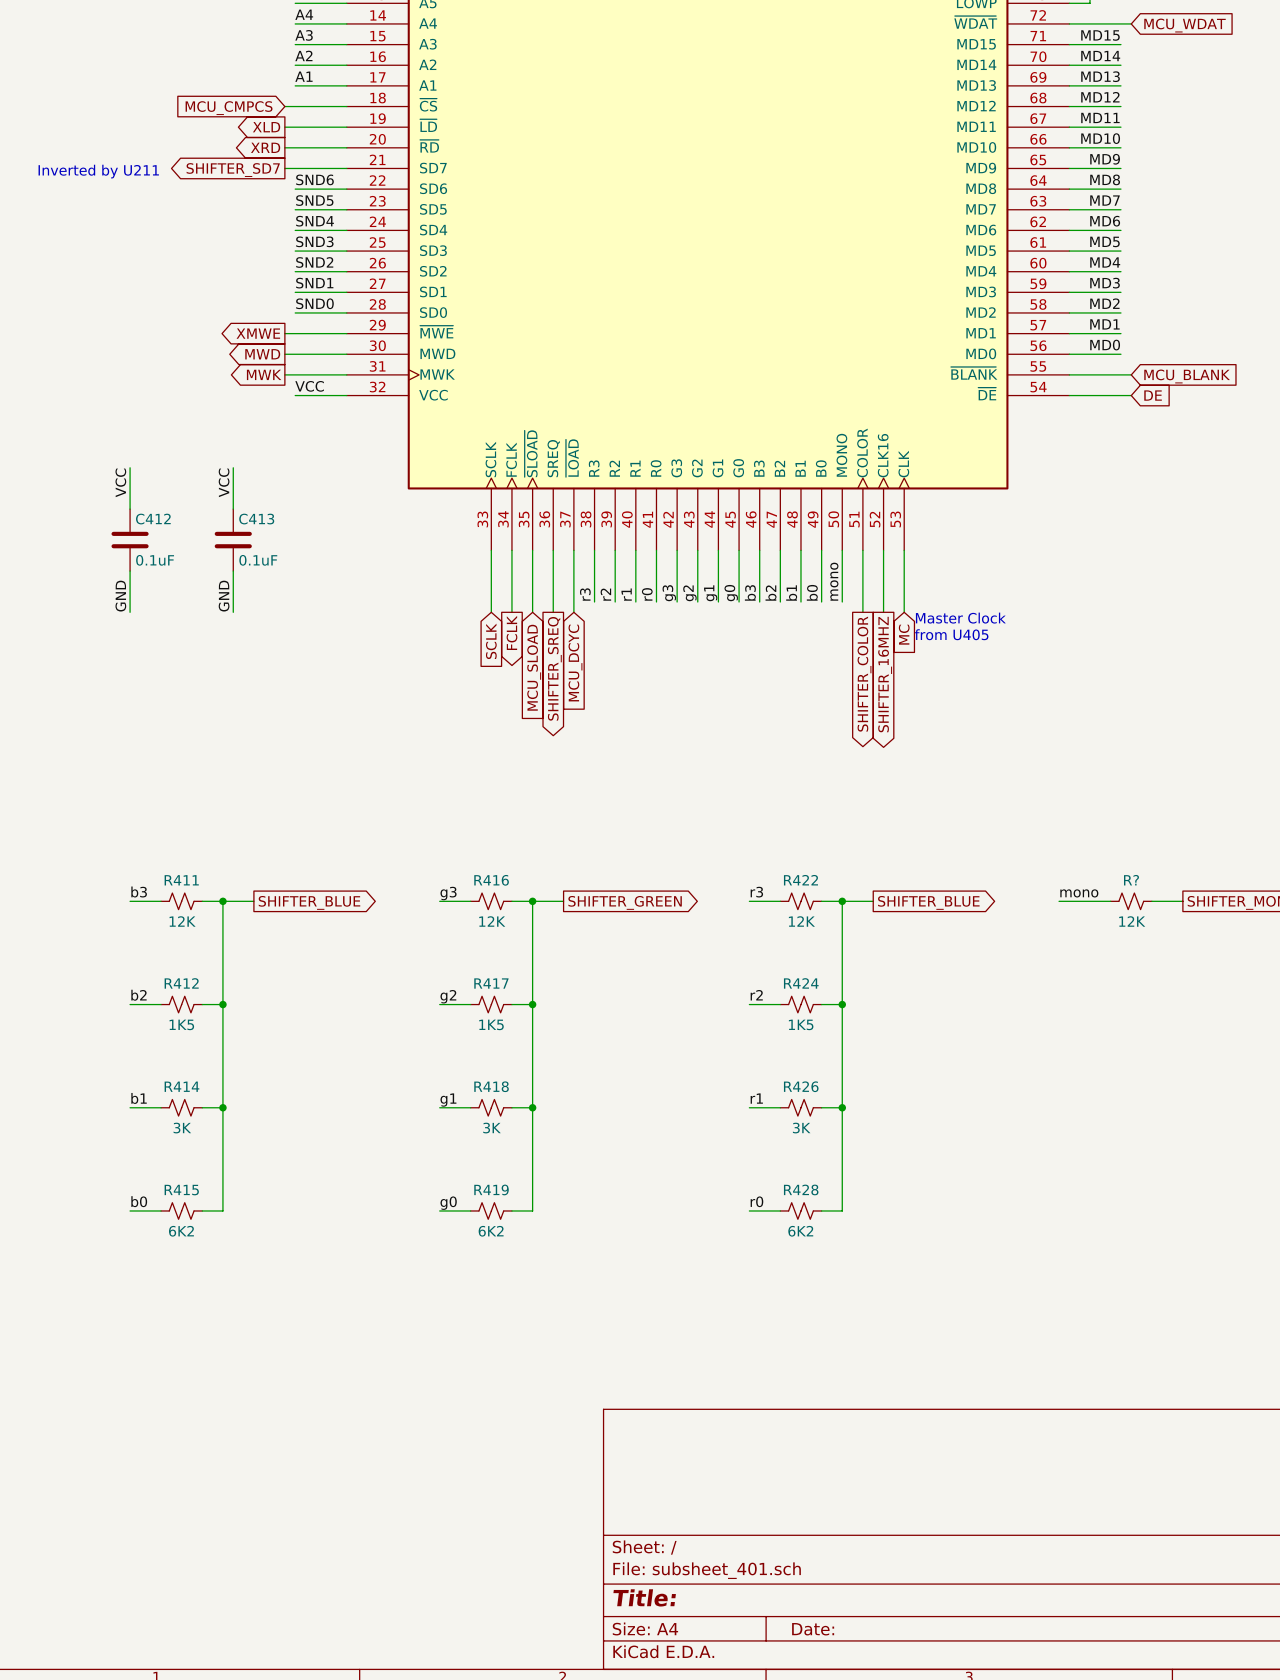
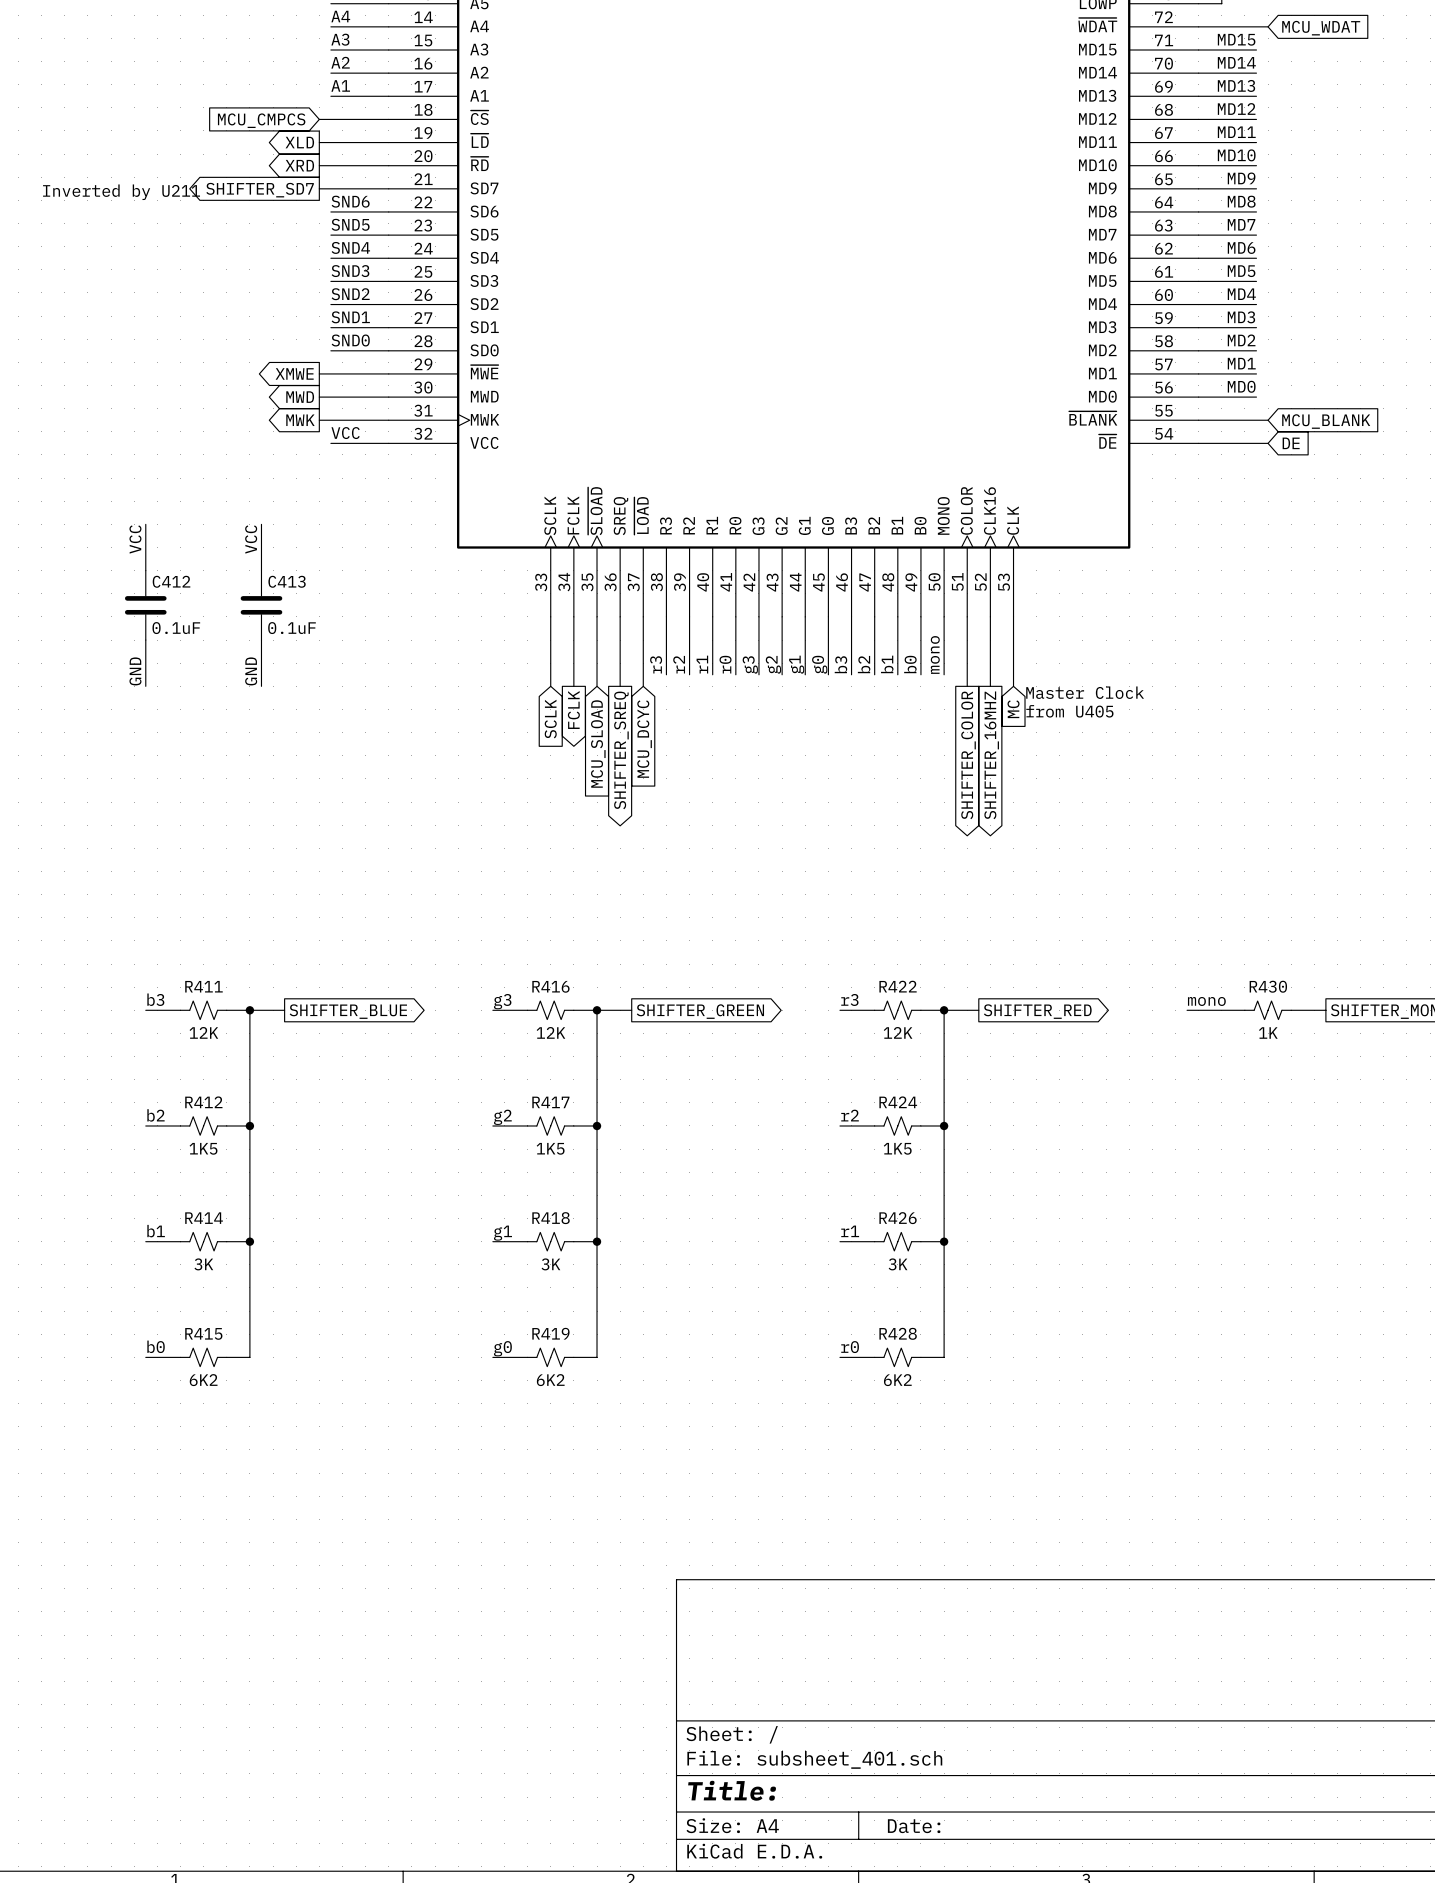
R? name: R? (1131, 880) -> R430 (1268, 986)
global label: SHIFTER_BLUE (928, 902) -> SHIFTER_RED (1037, 1011)
R? value: 12K (1132, 921) -> 1K (1268, 1033)

